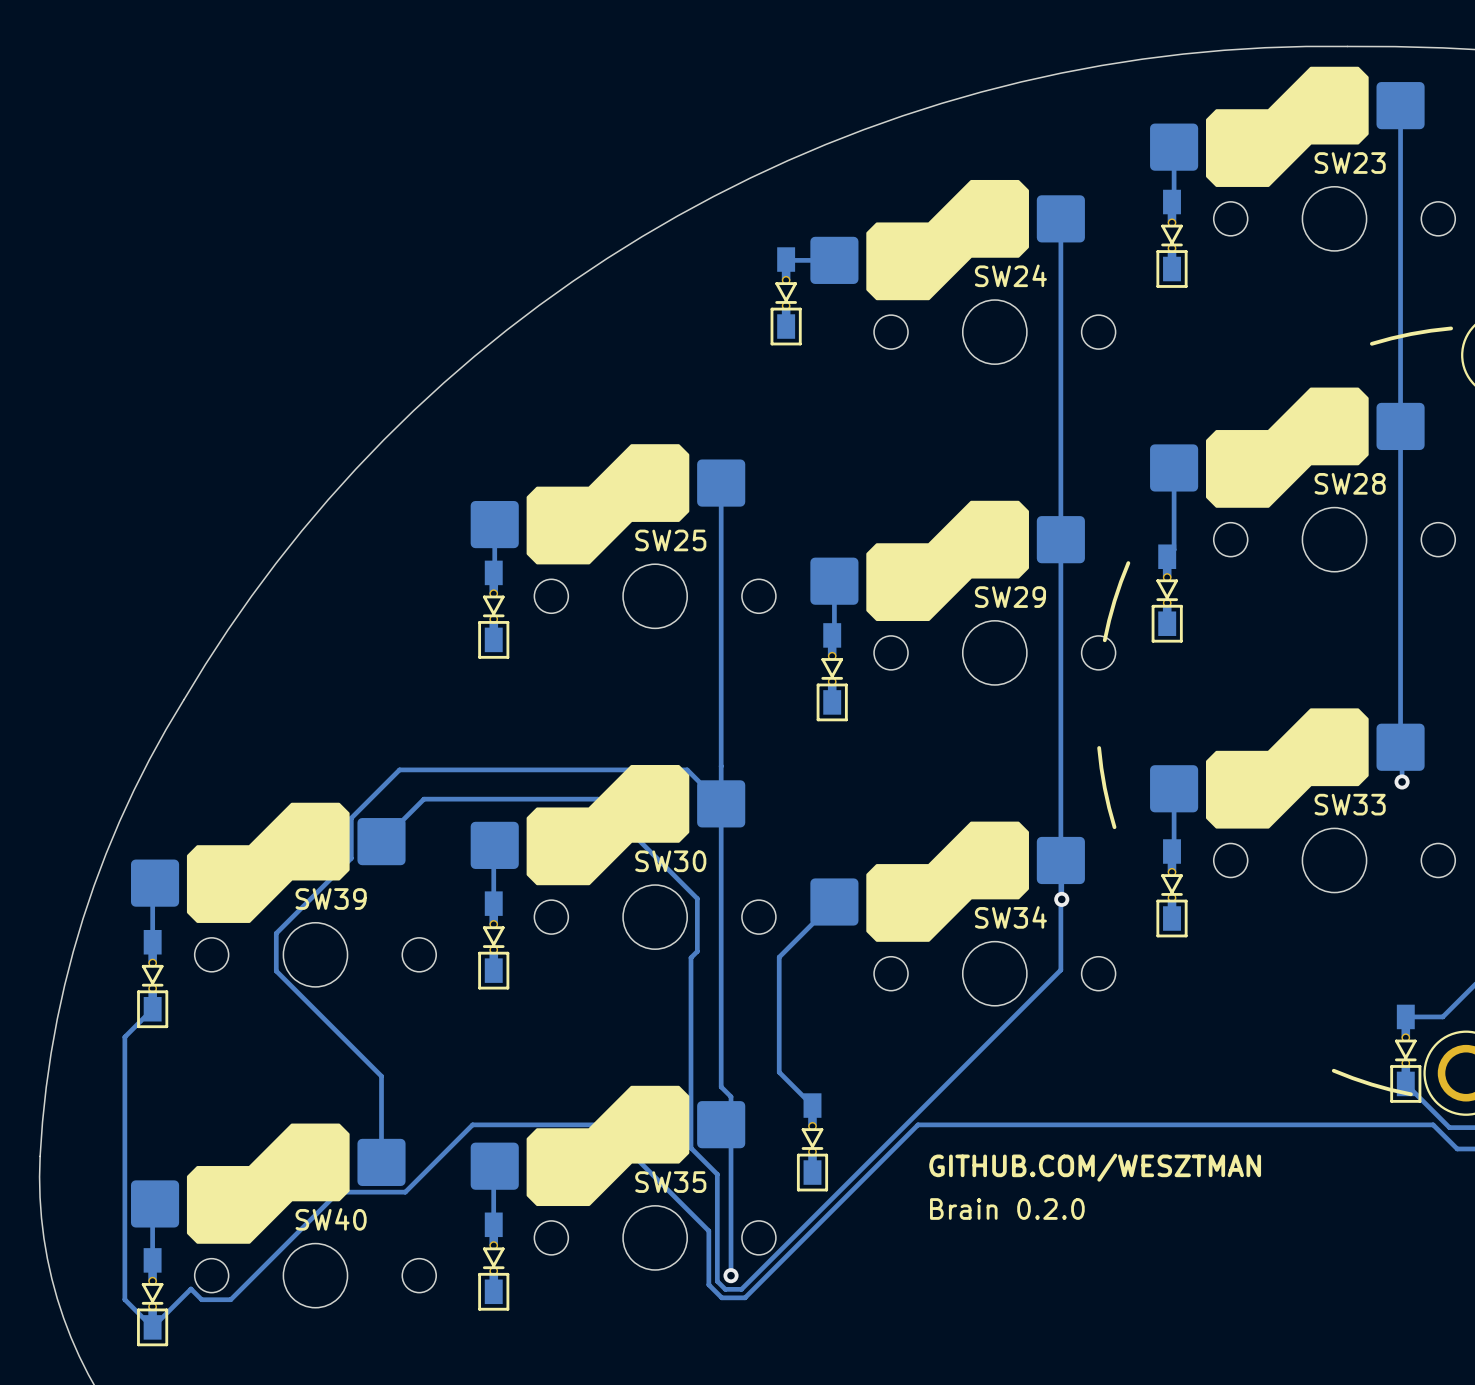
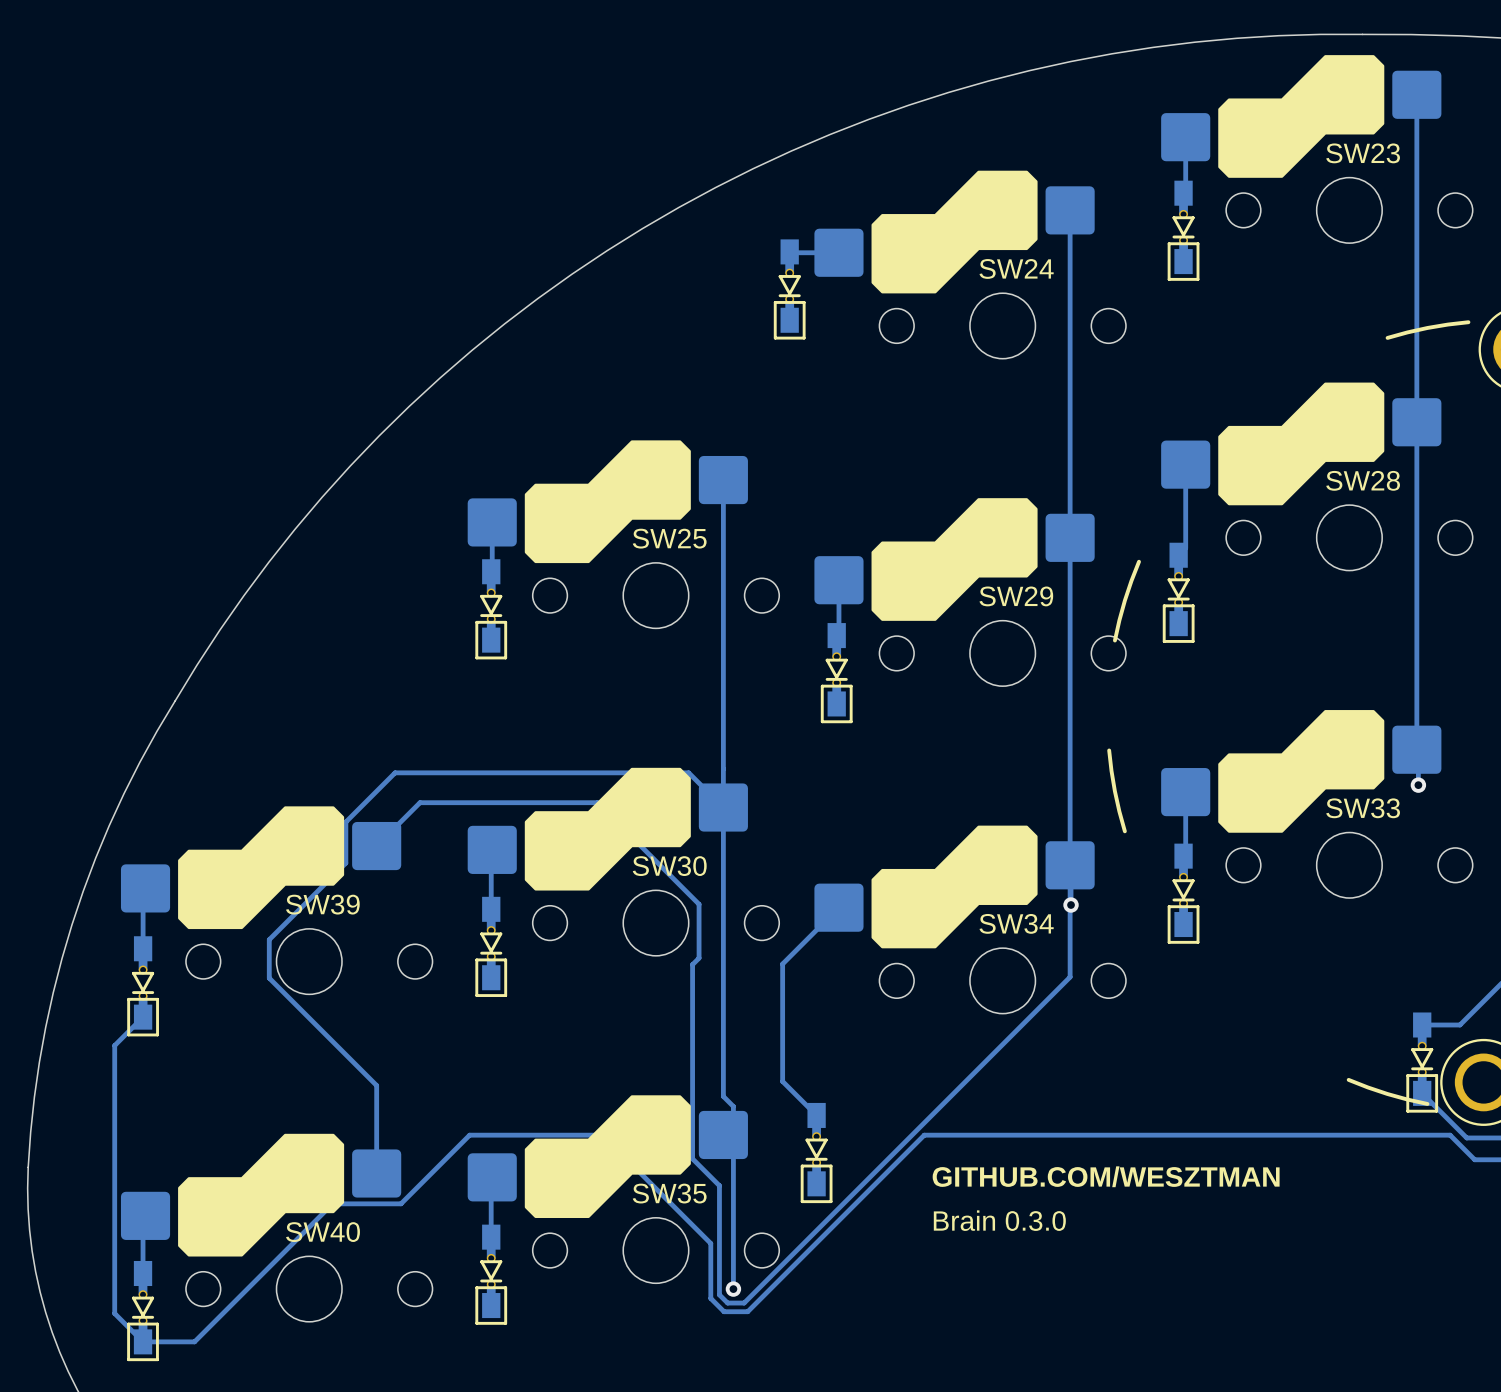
text: Brain 0.2.0 (1007, 1208) -> Brain 0.3.0 (999, 1220)
track: (230, 1299) (201, 1299) (190, 1289) (152, 1327) -> (222, 1313) (194, 1341) (143, 1341)

